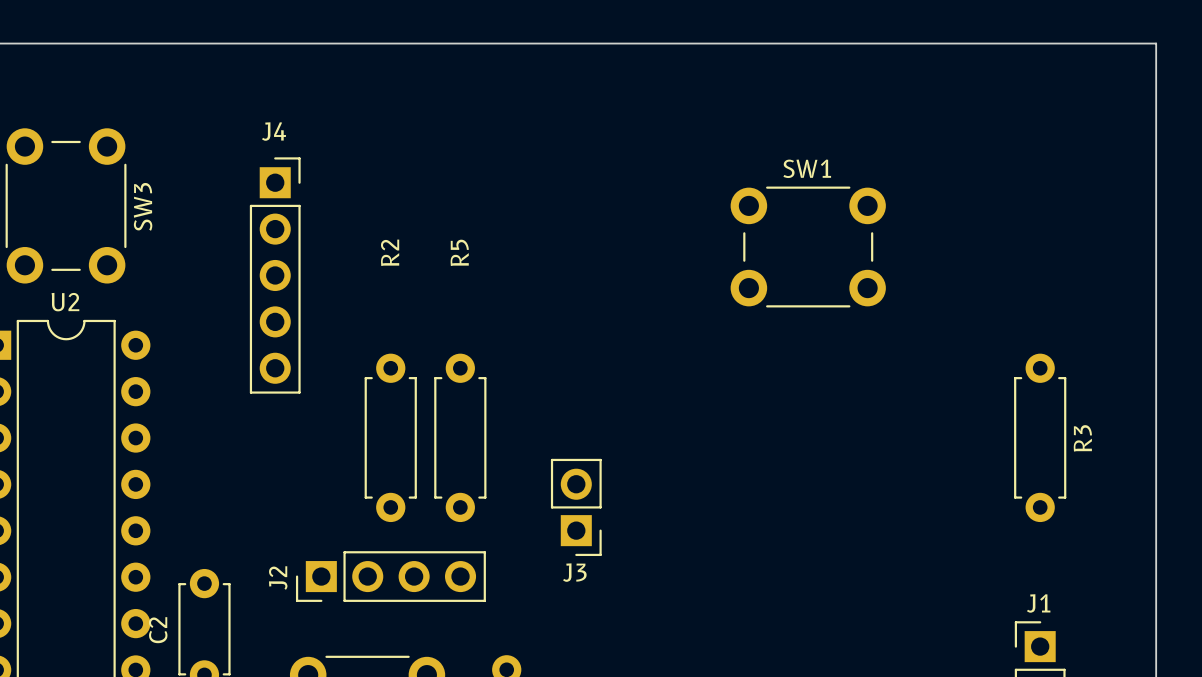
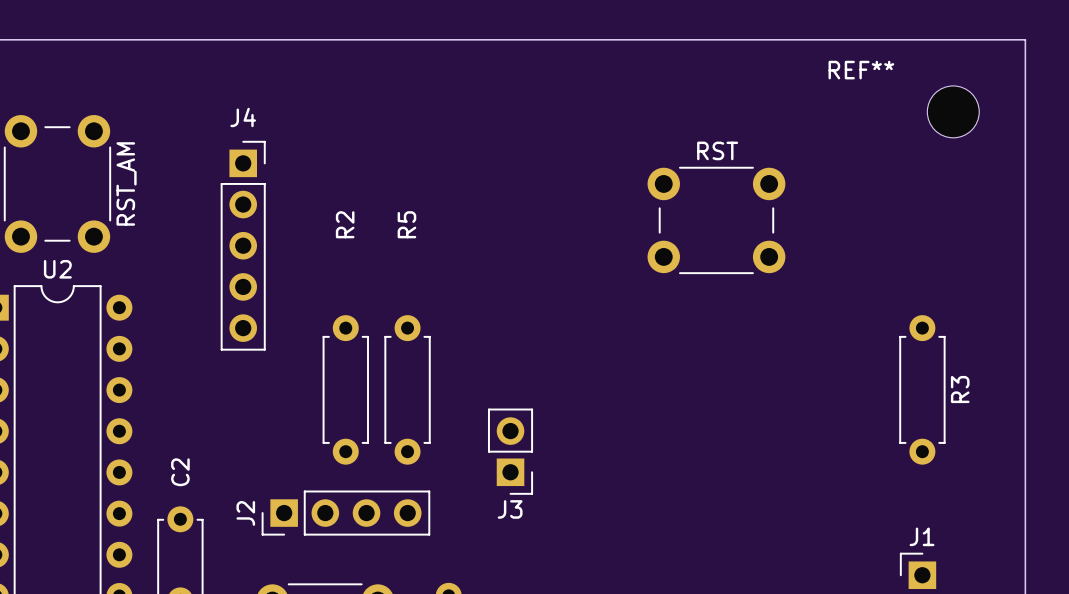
REF**: none -> (953, 111)
SW1 name: SW1 (807, 168) -> RST (717, 150)
SW3 name: SW3 (143, 206) -> RST_AM (126, 183)
C2 name position: C2 (158, 630) -> C2 (180, 472)

